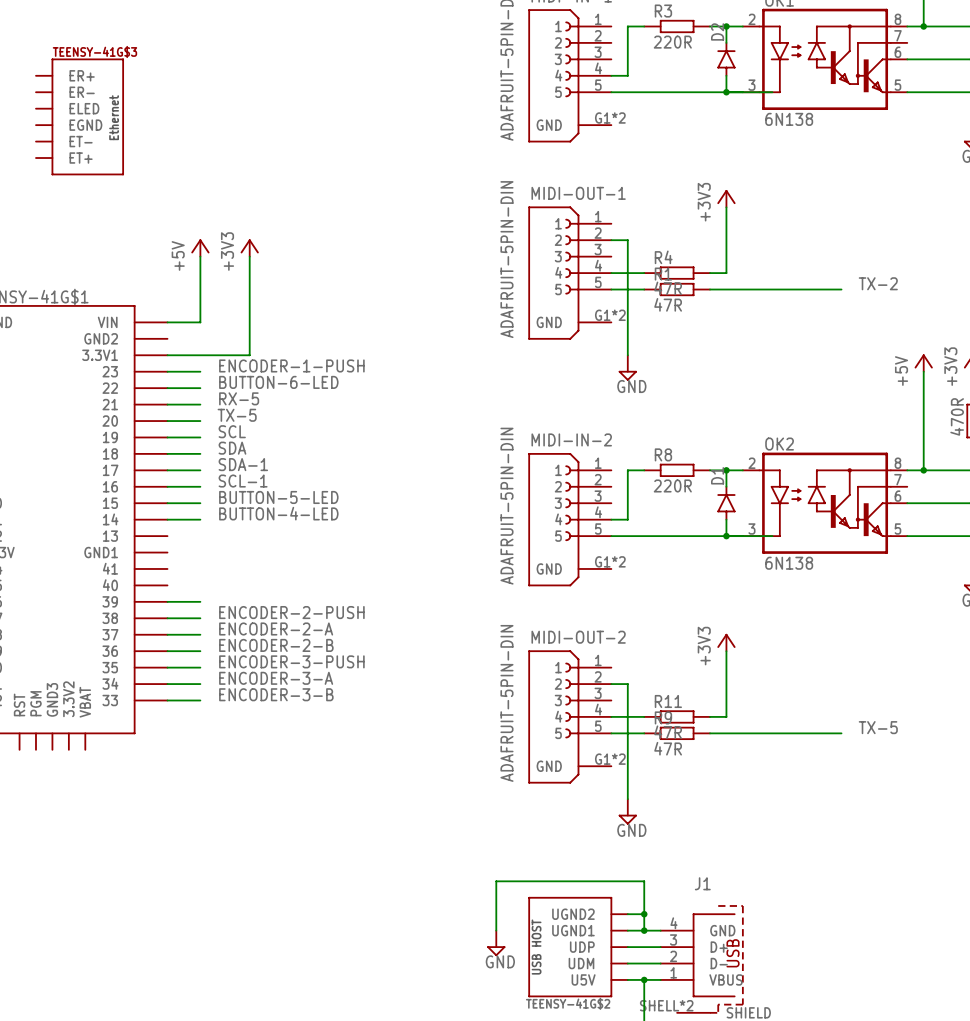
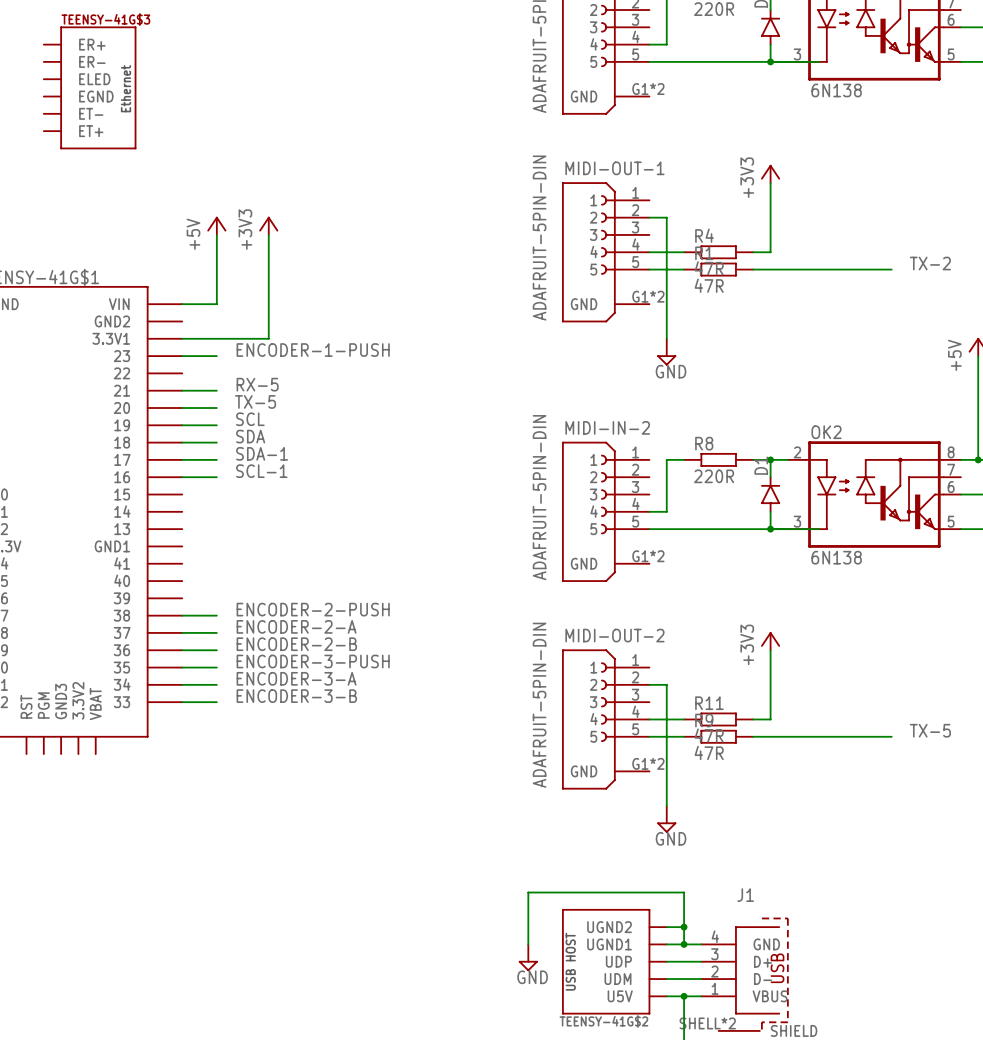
label: BUTTON-6-LED (278, 382) -> none
wire: (167, 388) (200, 388) -> none
label: BUTTON-5-LED (278, 497) -> none
wire: (167, 503) (200, 503) -> none
label: BUTTON-4-LED (278, 513) -> none
wire: (167, 519) (200, 519) -> none
wire: (167, 601) (200, 601) -> none

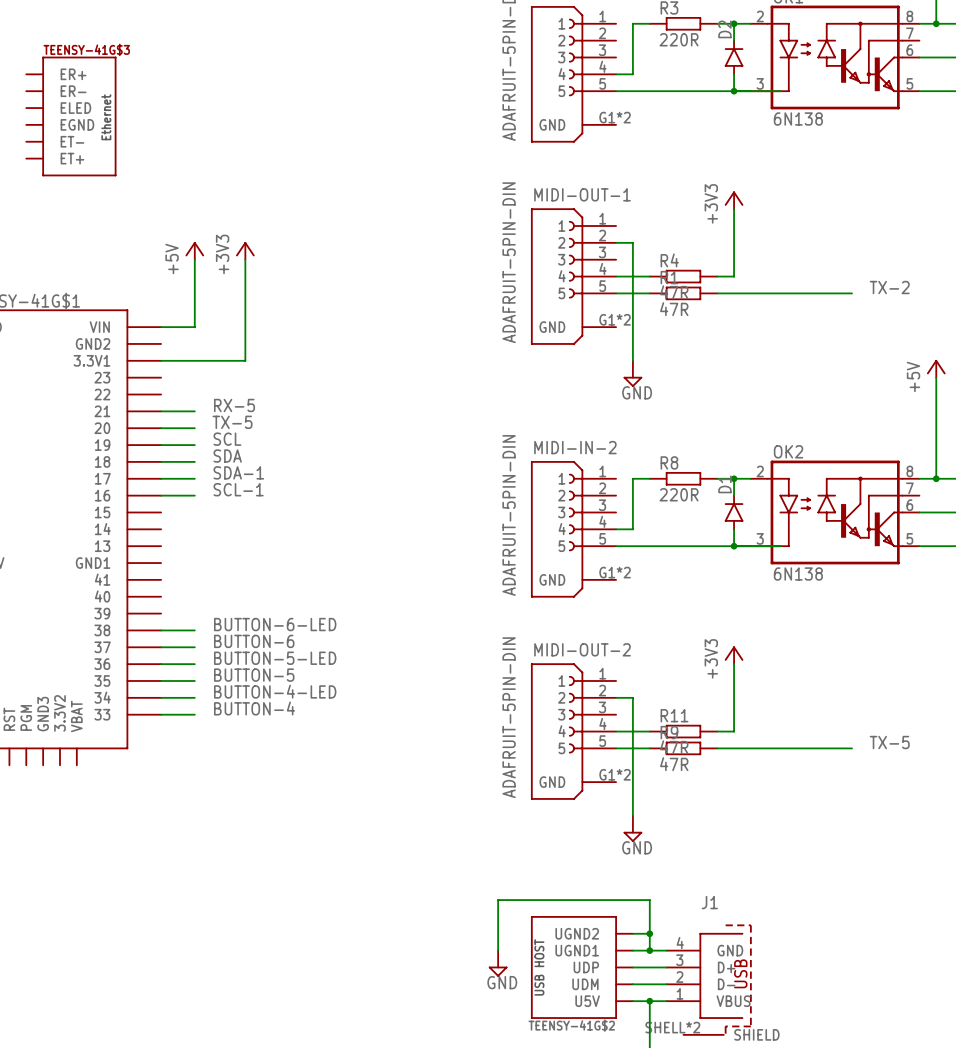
label: ENCODER-1-PUSH (313, 350) -> none
wire: (182, 356) (216, 356) -> none
label: ENCODER-2-PUSH (313, 609) -> BUTTON-6-LED (275, 624)
label: ENCODER-2-A (296, 626) -> BUTTON-6 (254, 641)
label: ENCODER-2-B (296, 644) -> BUTTON-5-LED (275, 658)
label: ENCODER-3-PUSH (313, 661) -> BUTTON-5 (254, 675)
label: ENCODER-3-A (296, 678) -> BUTTON-4-LED (275, 691)
label: ENCODER-3-B (296, 696) -> BUTTON-4 (254, 708)

